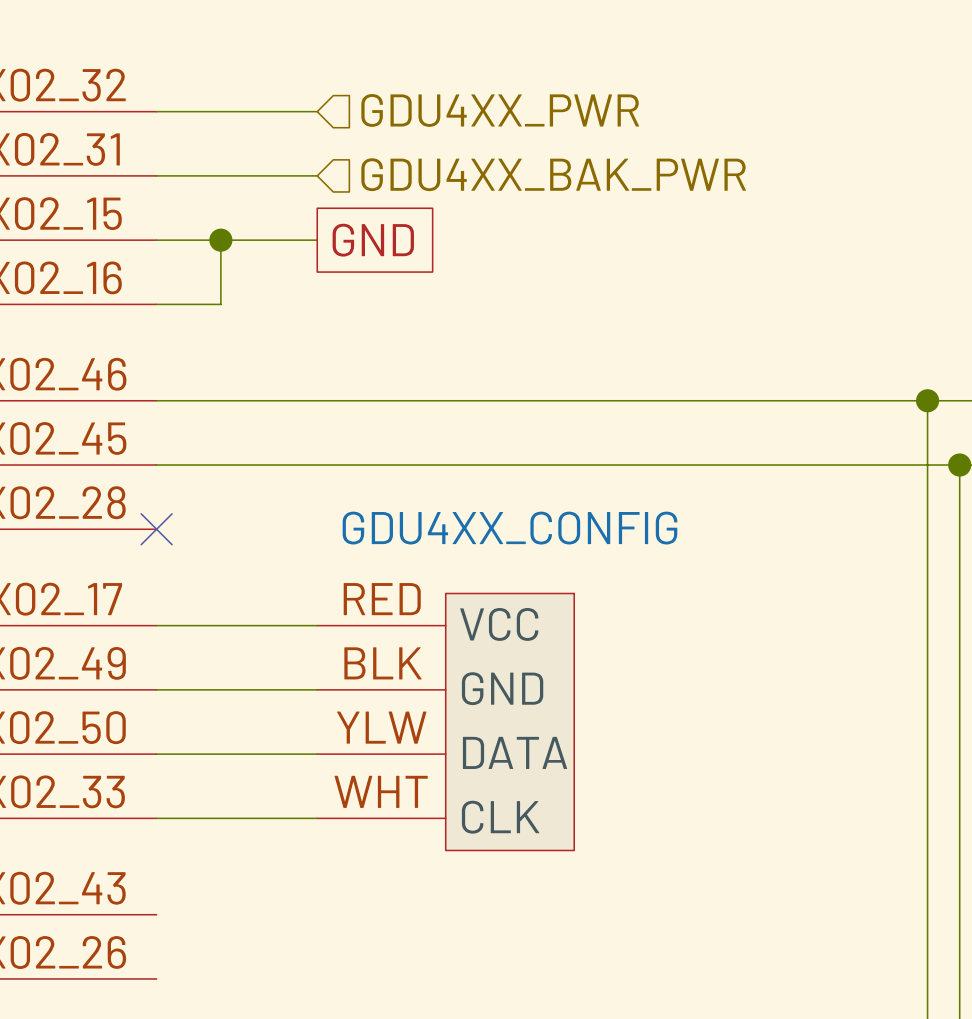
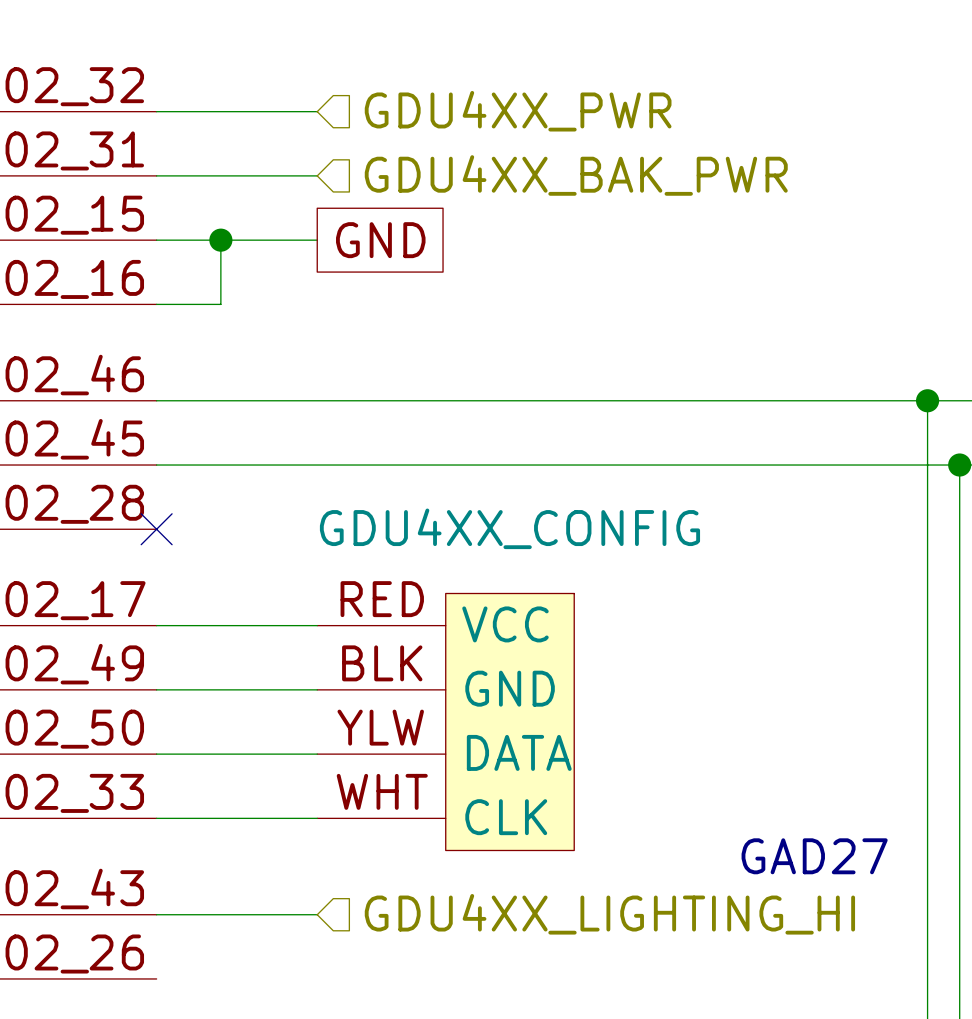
text: none -> GAD27 (814, 856)
hierarchical label: none -> GDU4XX_LIGHTING_HI (609, 914)
wire: none -> (156, 914) (317, 914)

